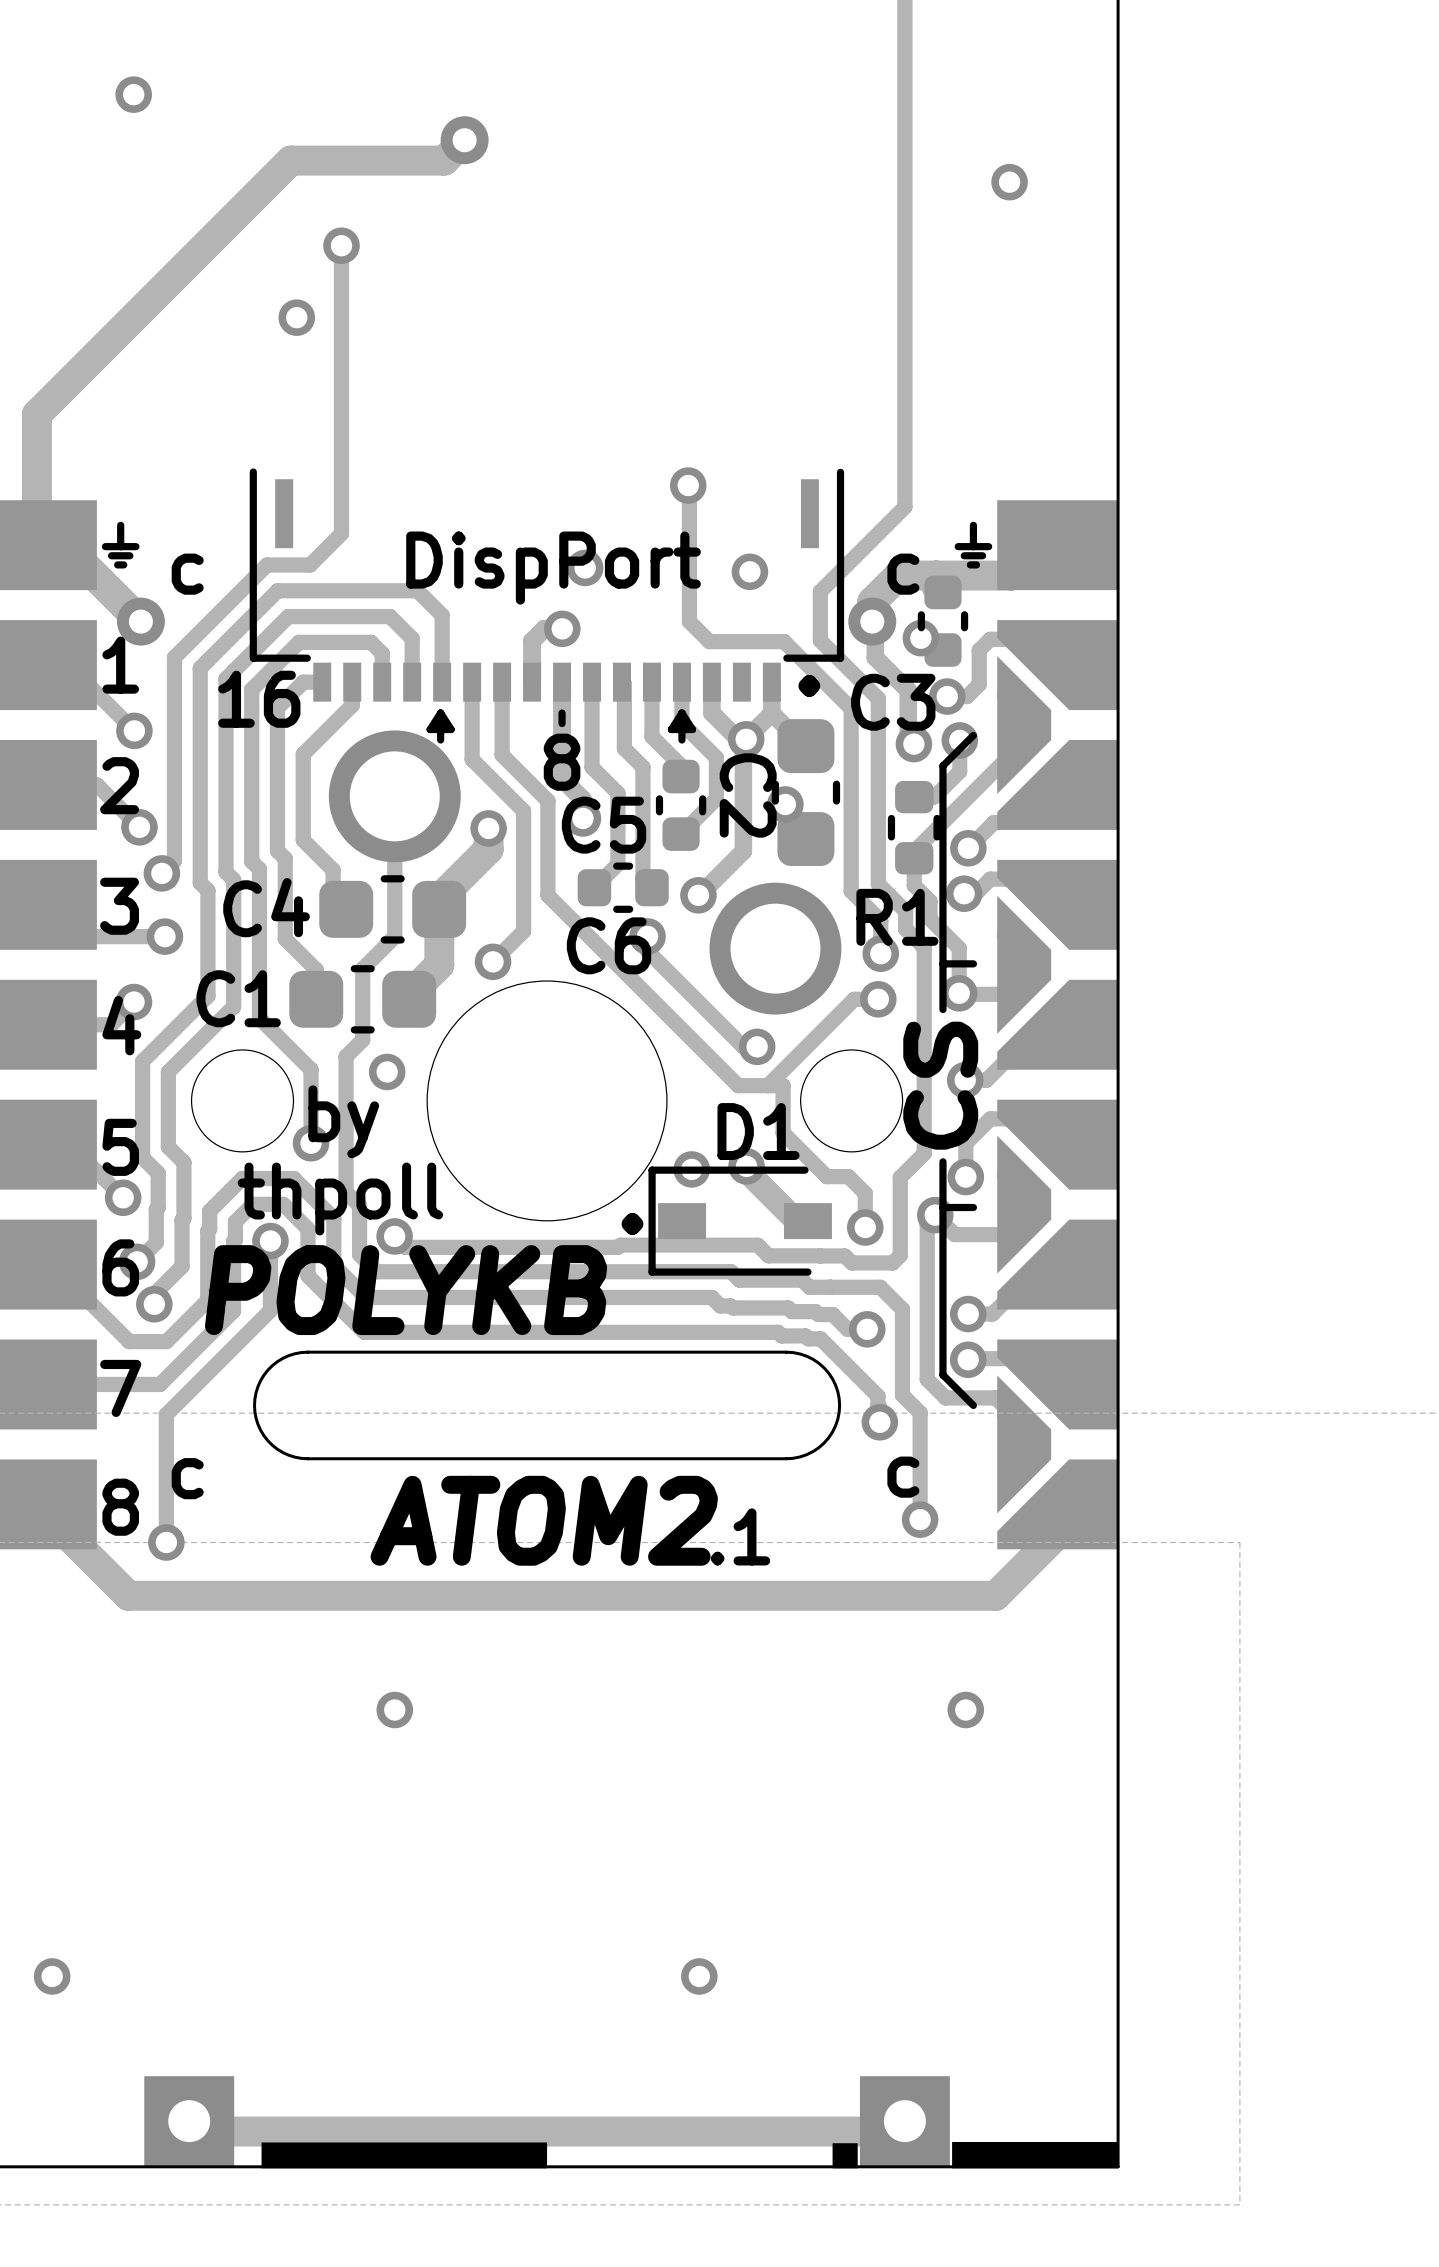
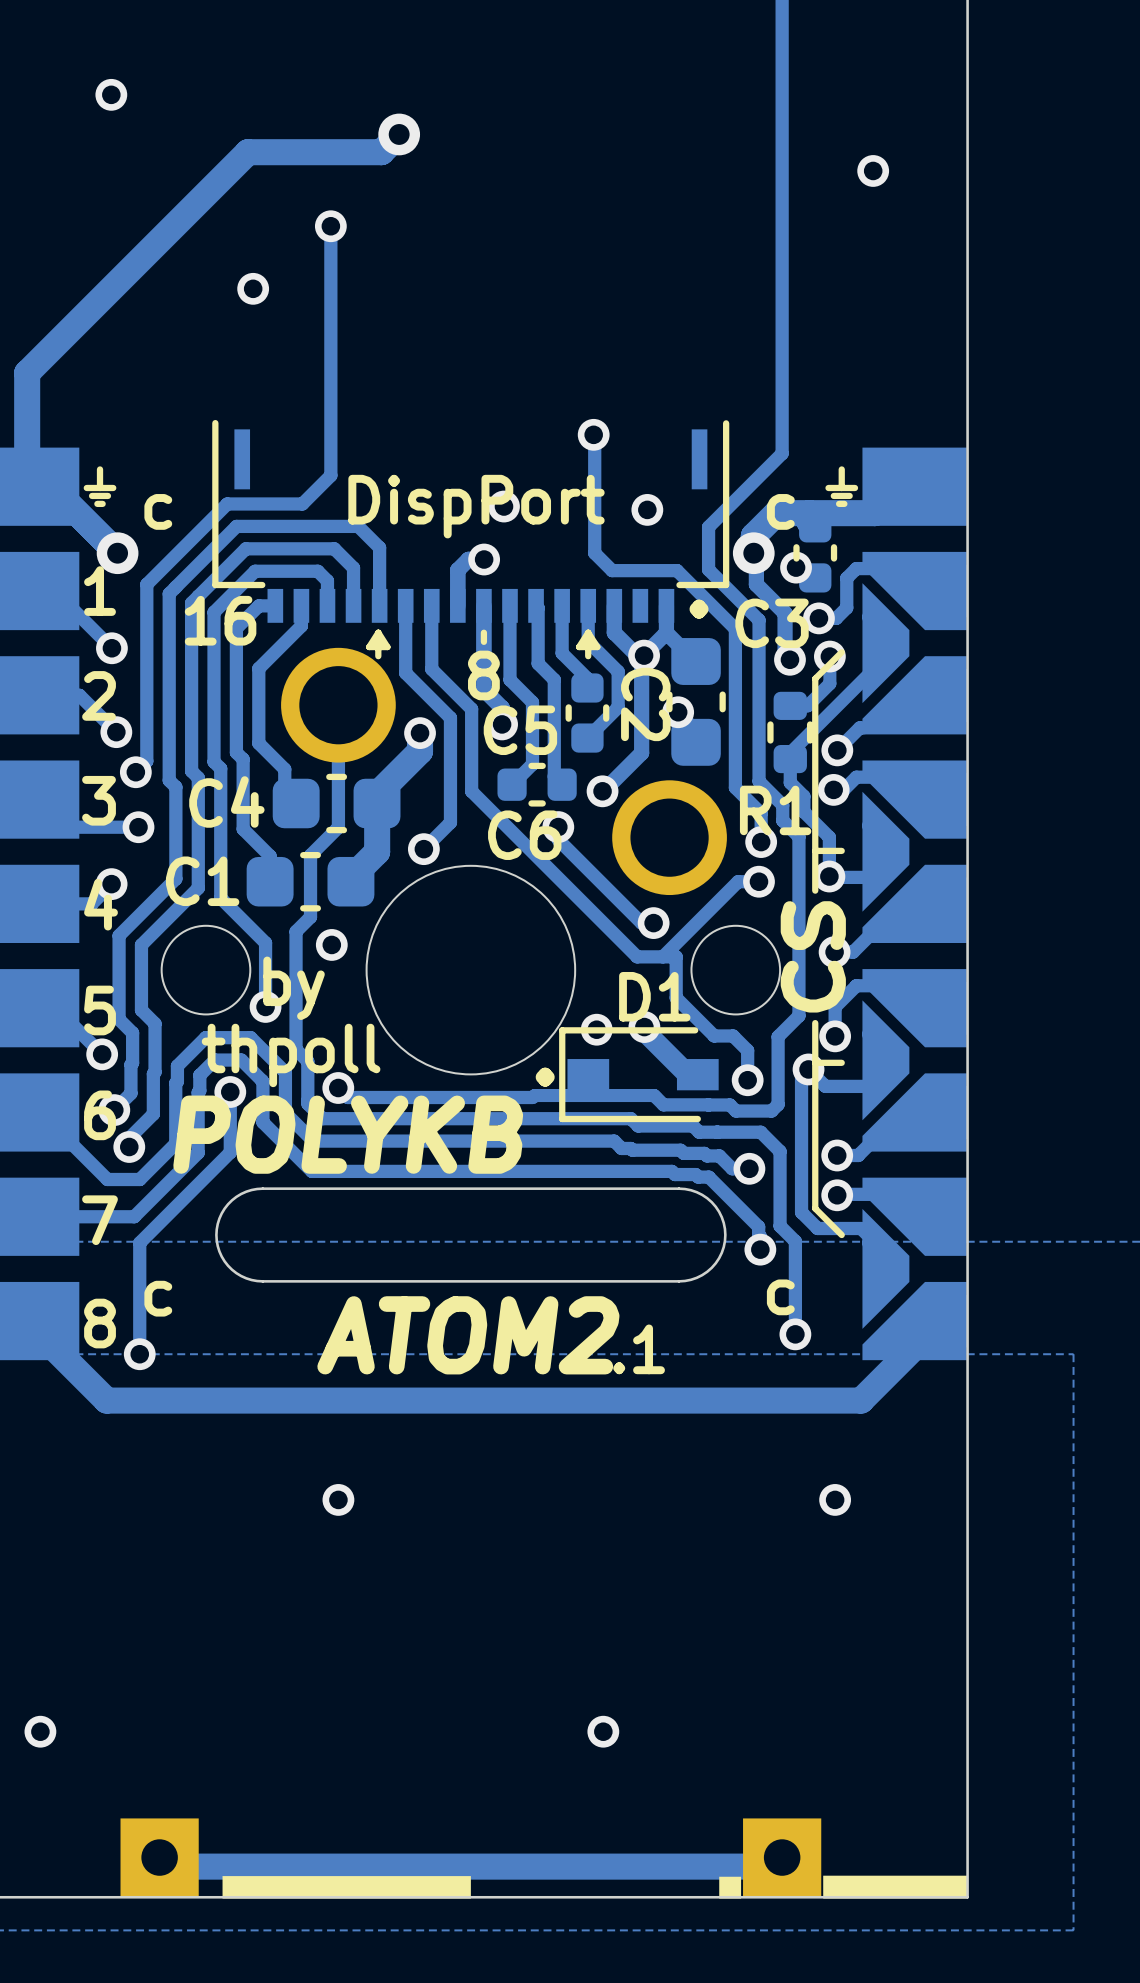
track: (341, 245) (341, 533) (310, 565) -> (330, 226) (330, 475) (302, 503) (264, 503)
via position: (341, 245) -> (330, 226)

